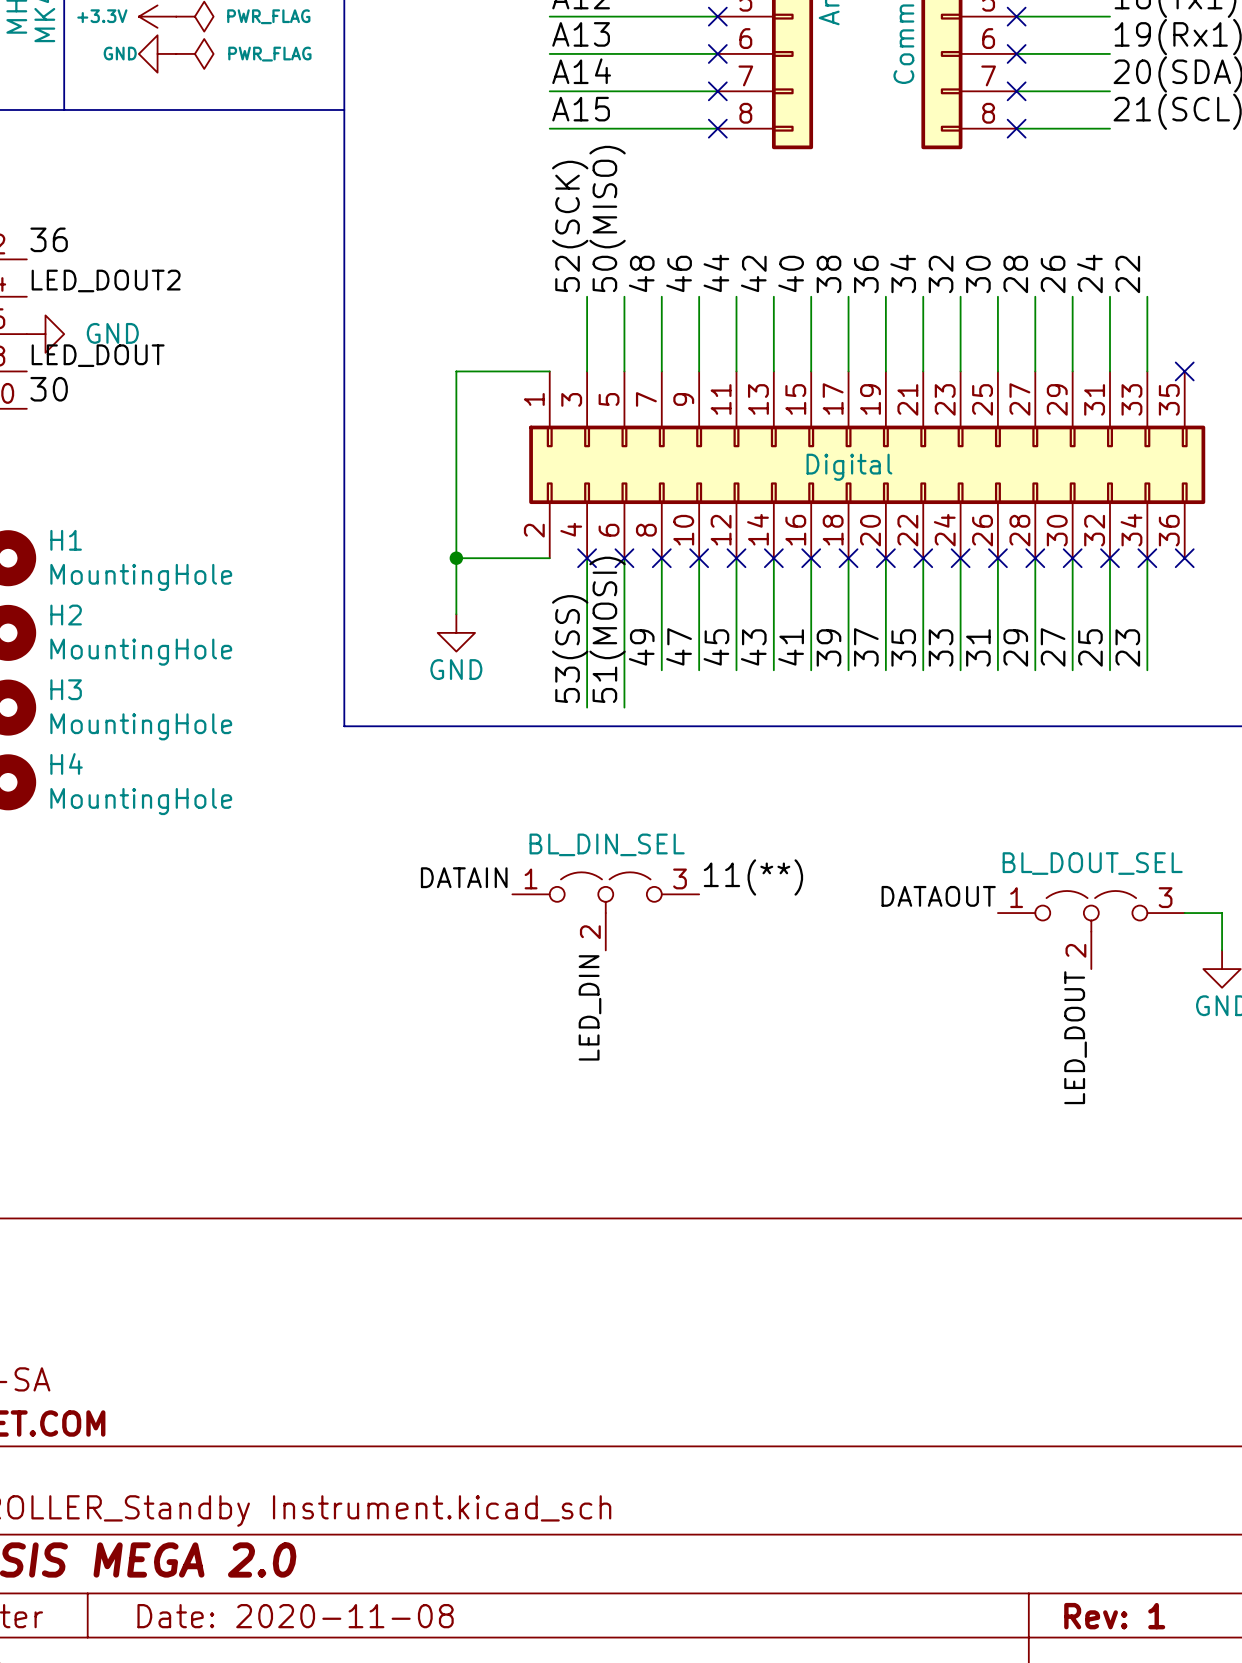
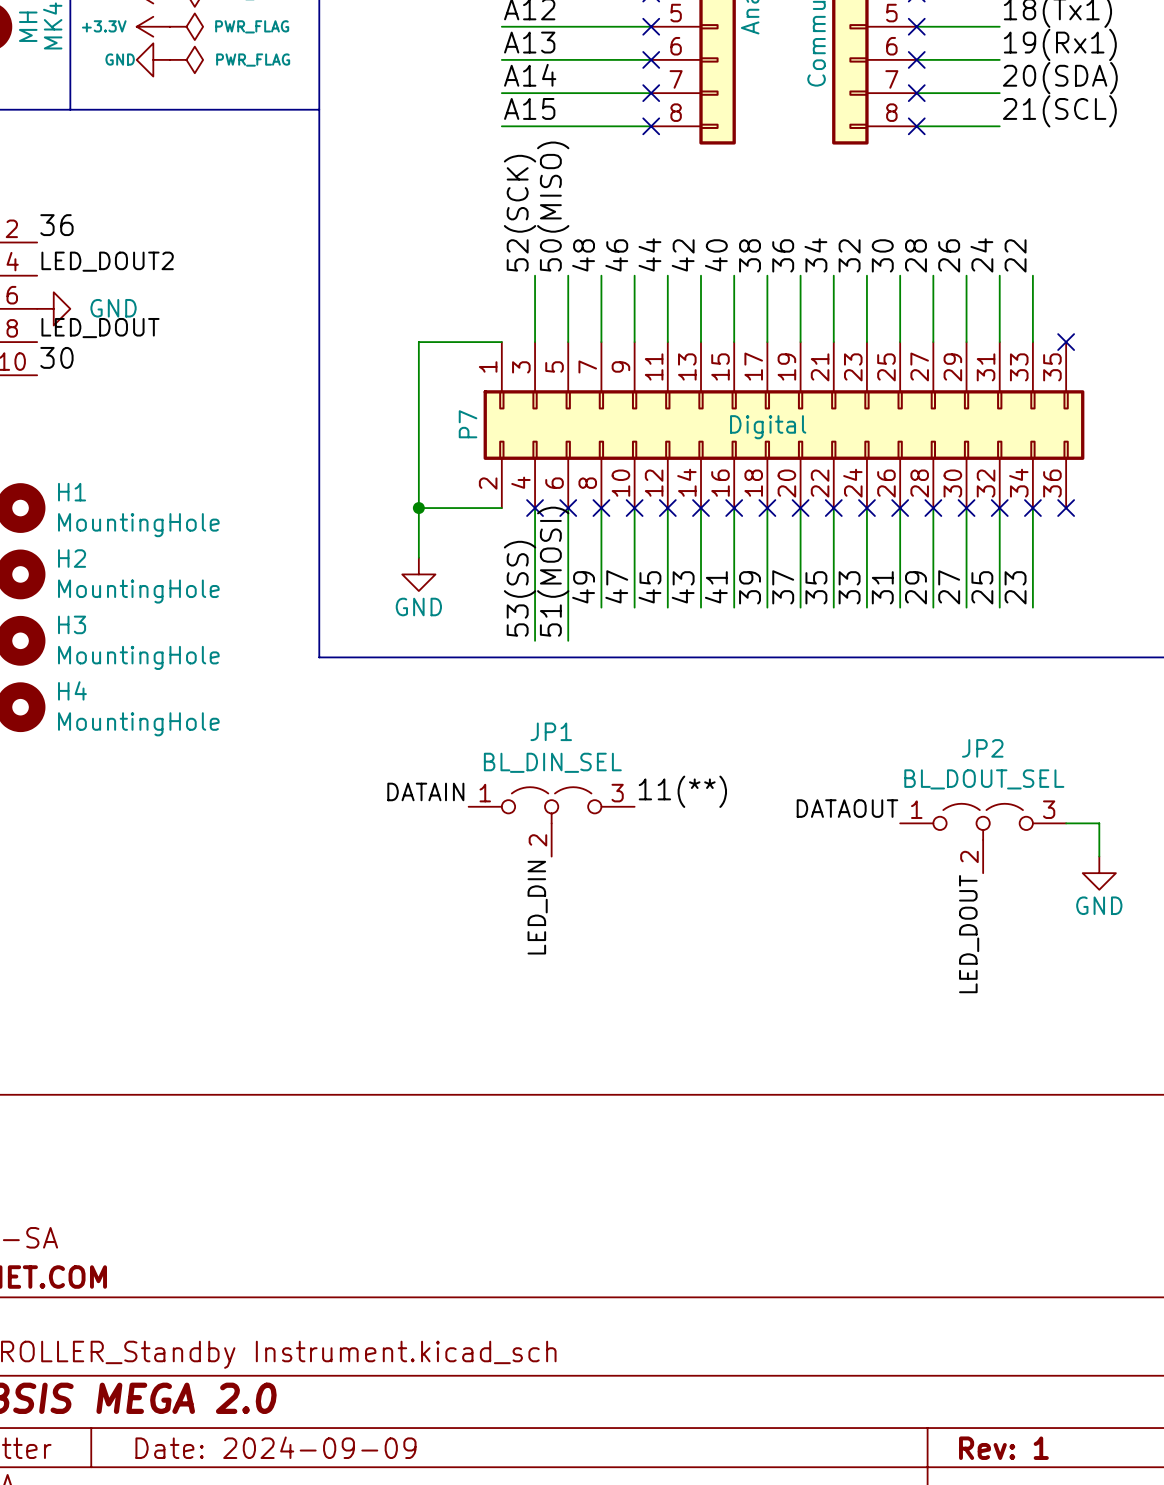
P7 name: none -> P7 (468, 424)
JP1 name: none -> JP1 (551, 731)
JP2 name: none -> JP2 (982, 748)
title block: Date: 2020-11-08 (295, 1616) -> Date: 2024-09-09 (275, 1447)

